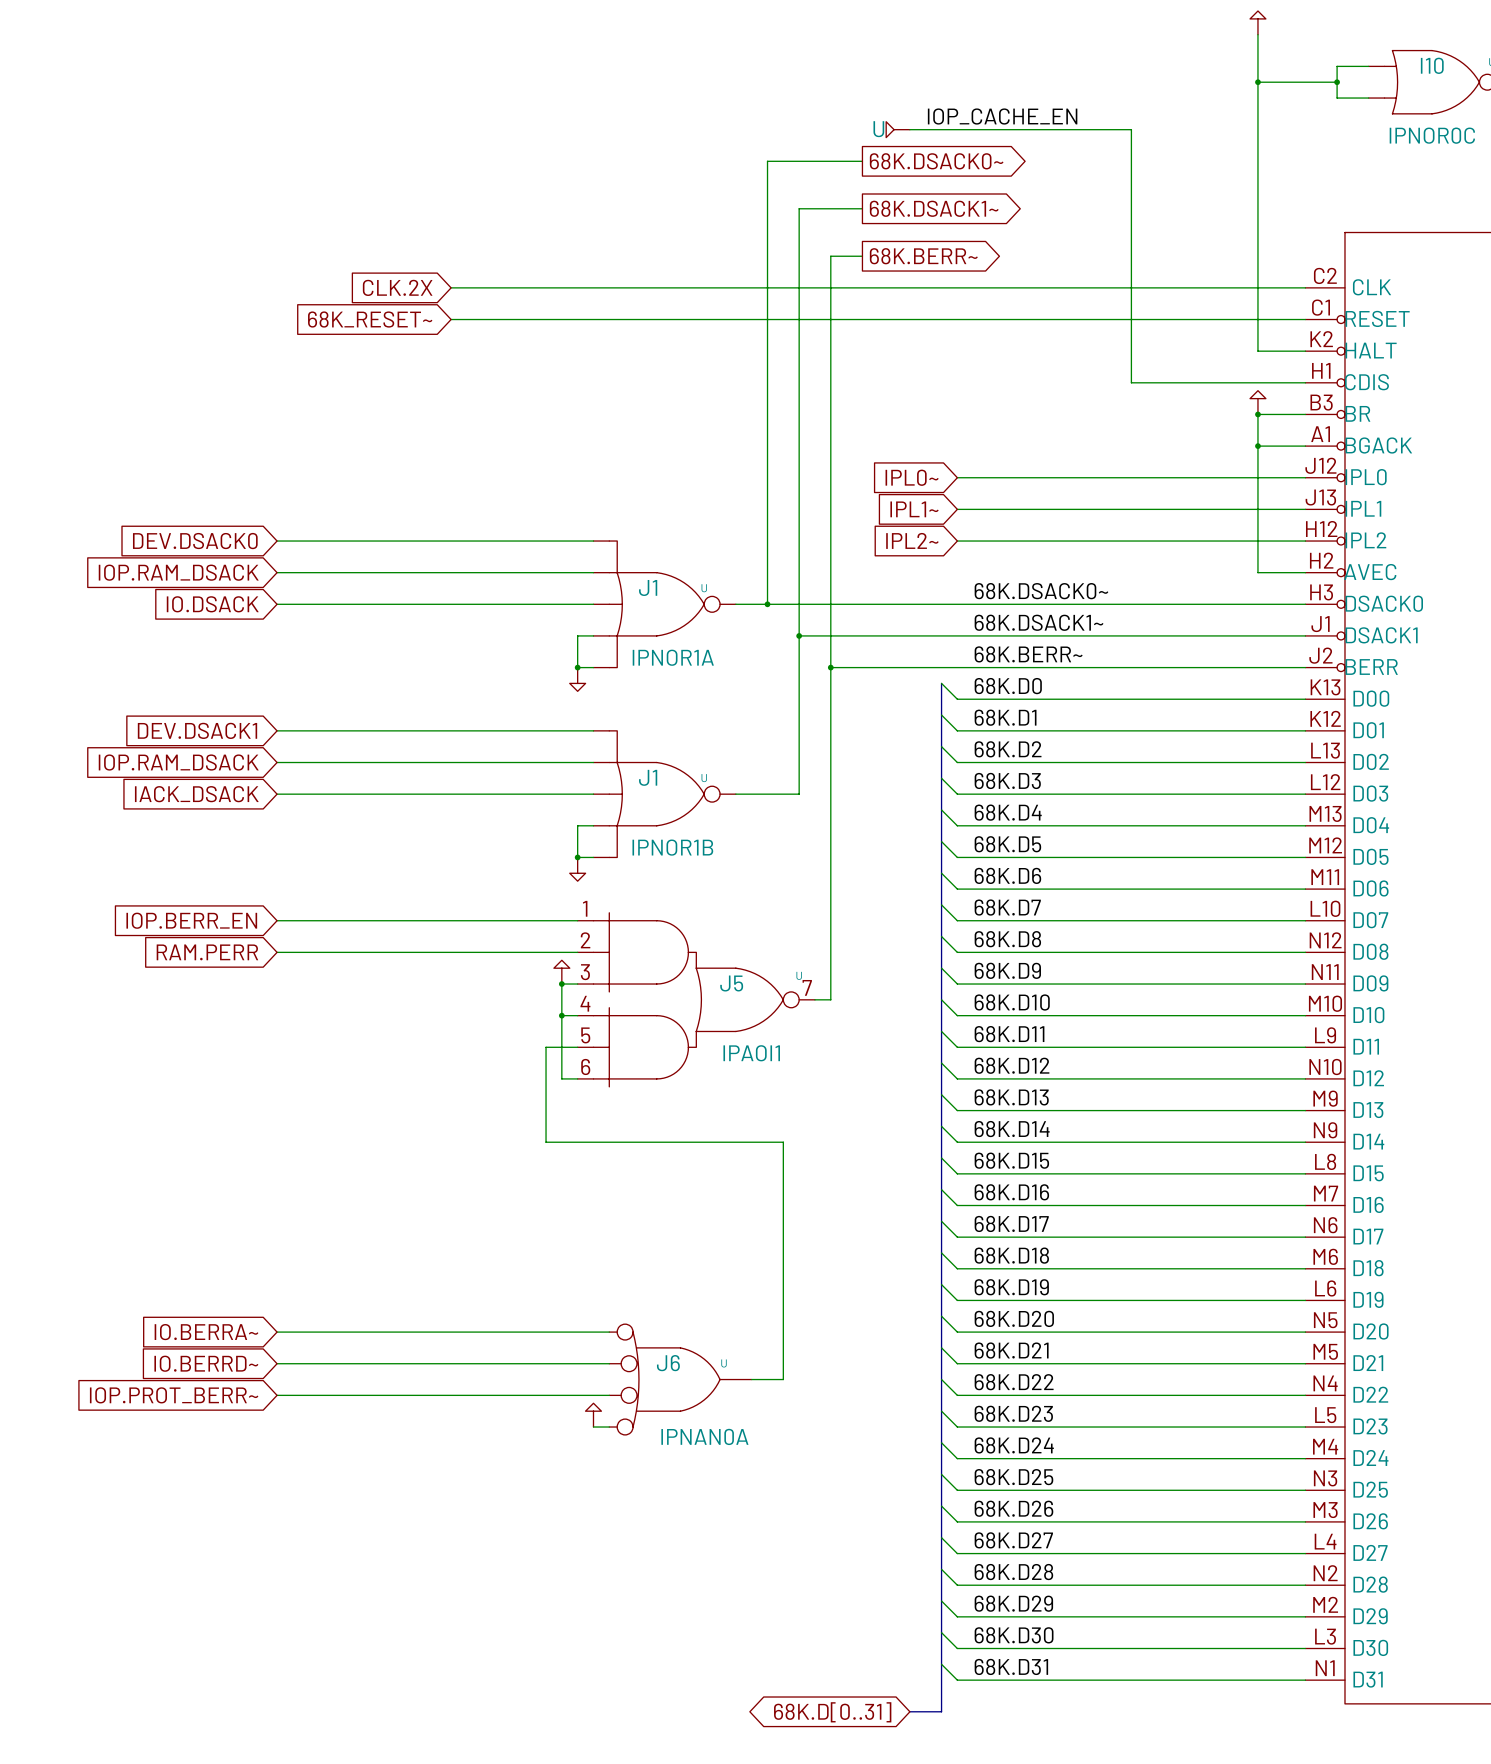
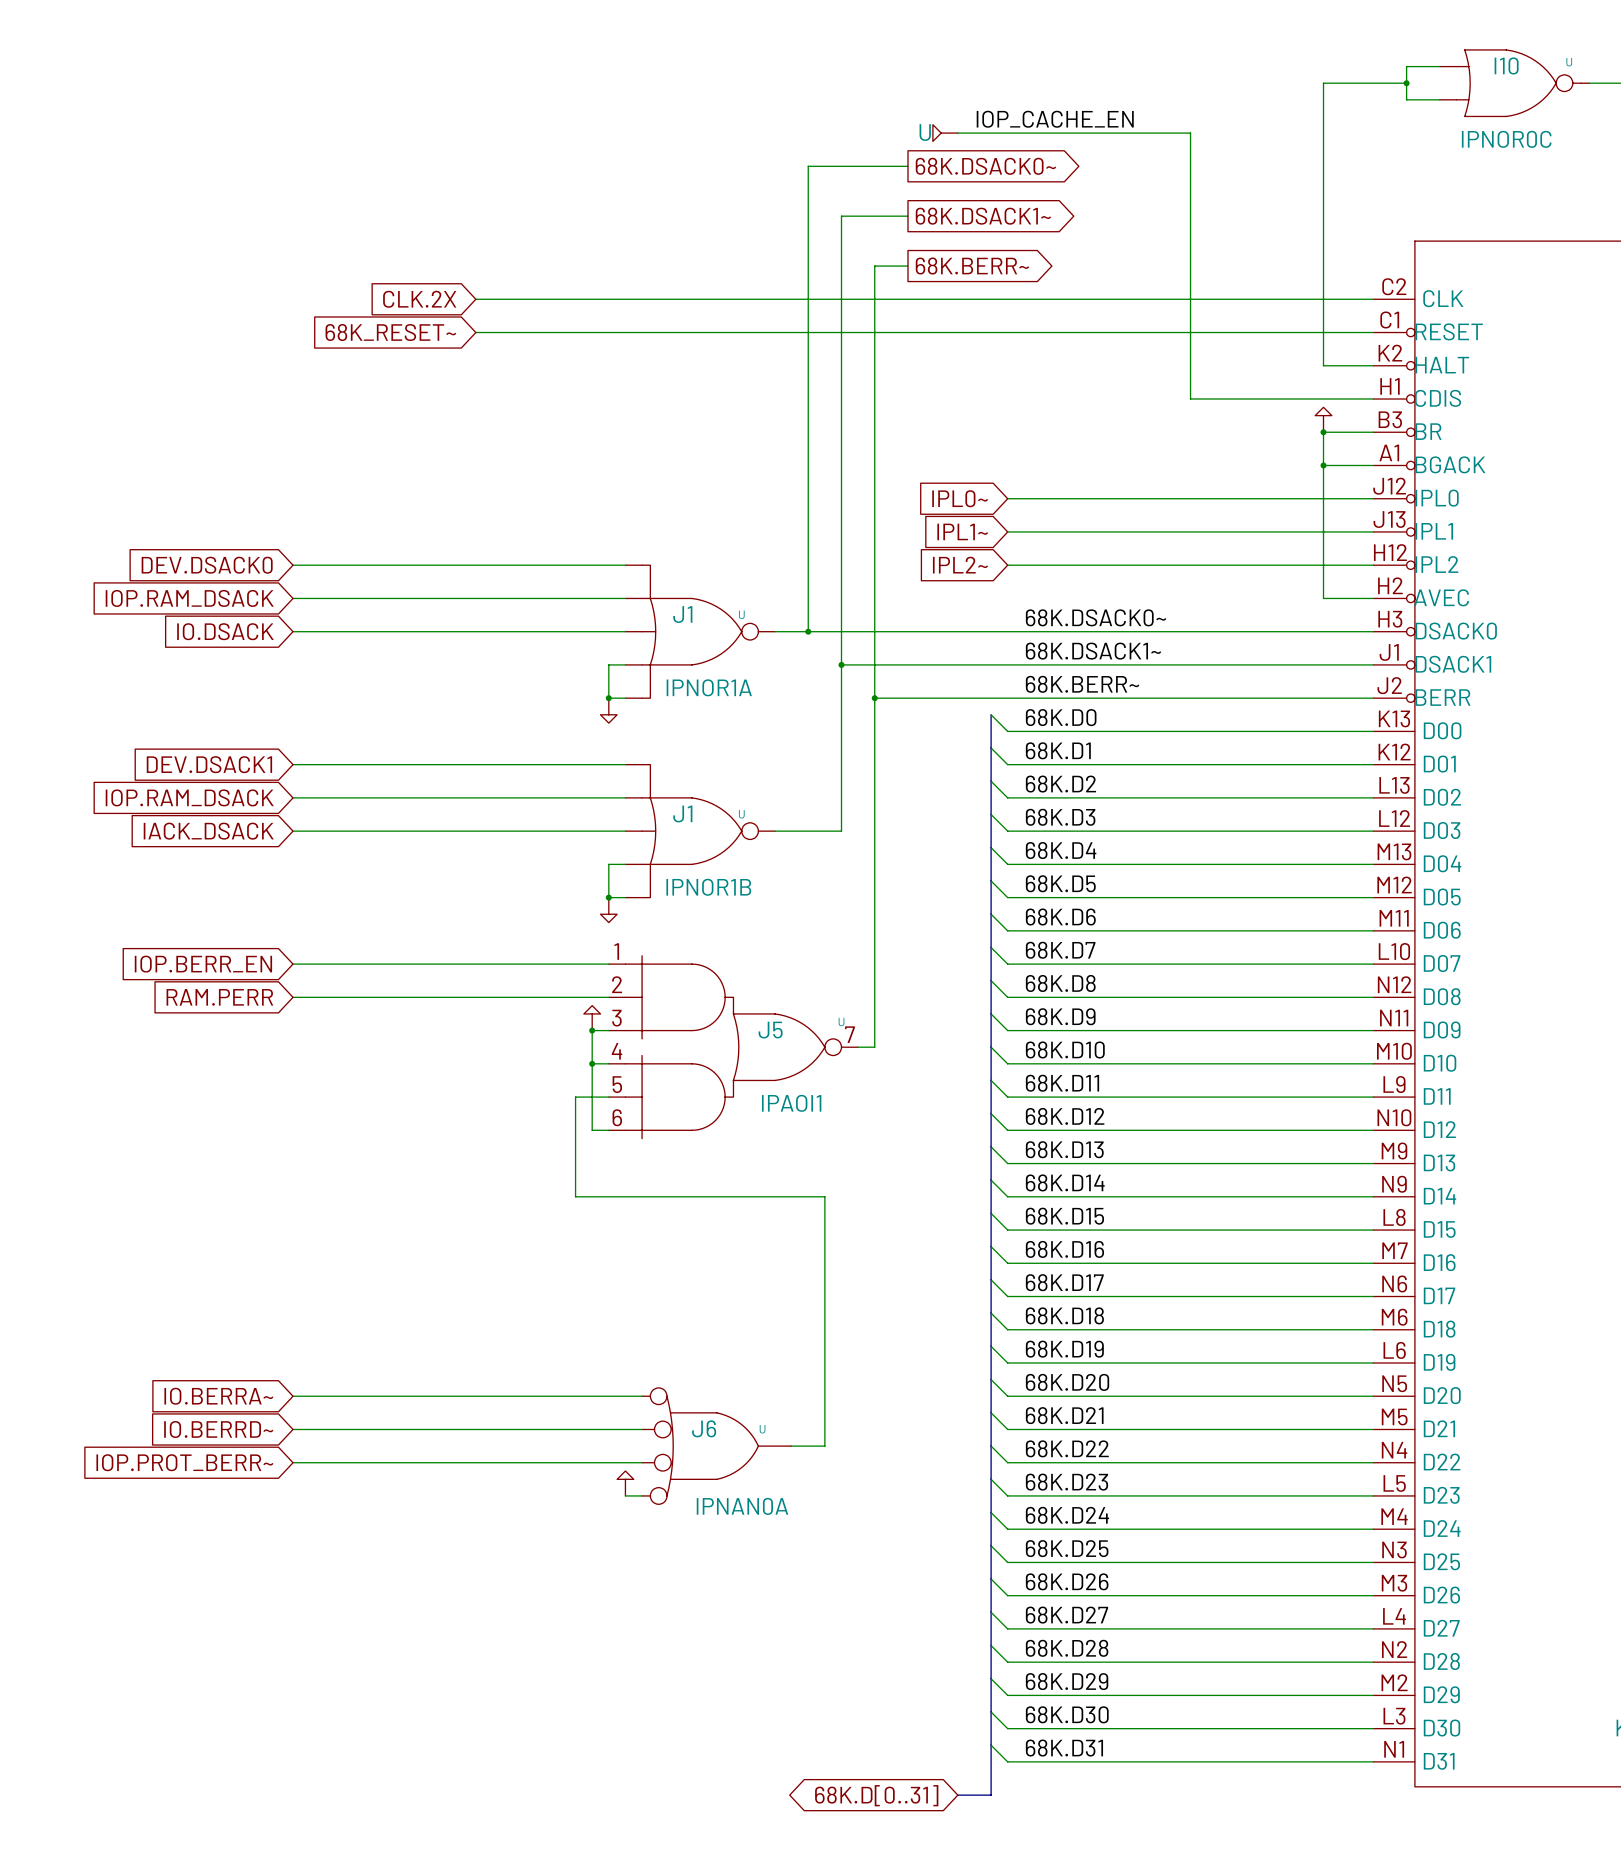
power symbol: (1257, 22) -> none
wire: (1257, 34) (1257, 82) -> none
junction: (1257, 82) -> none

